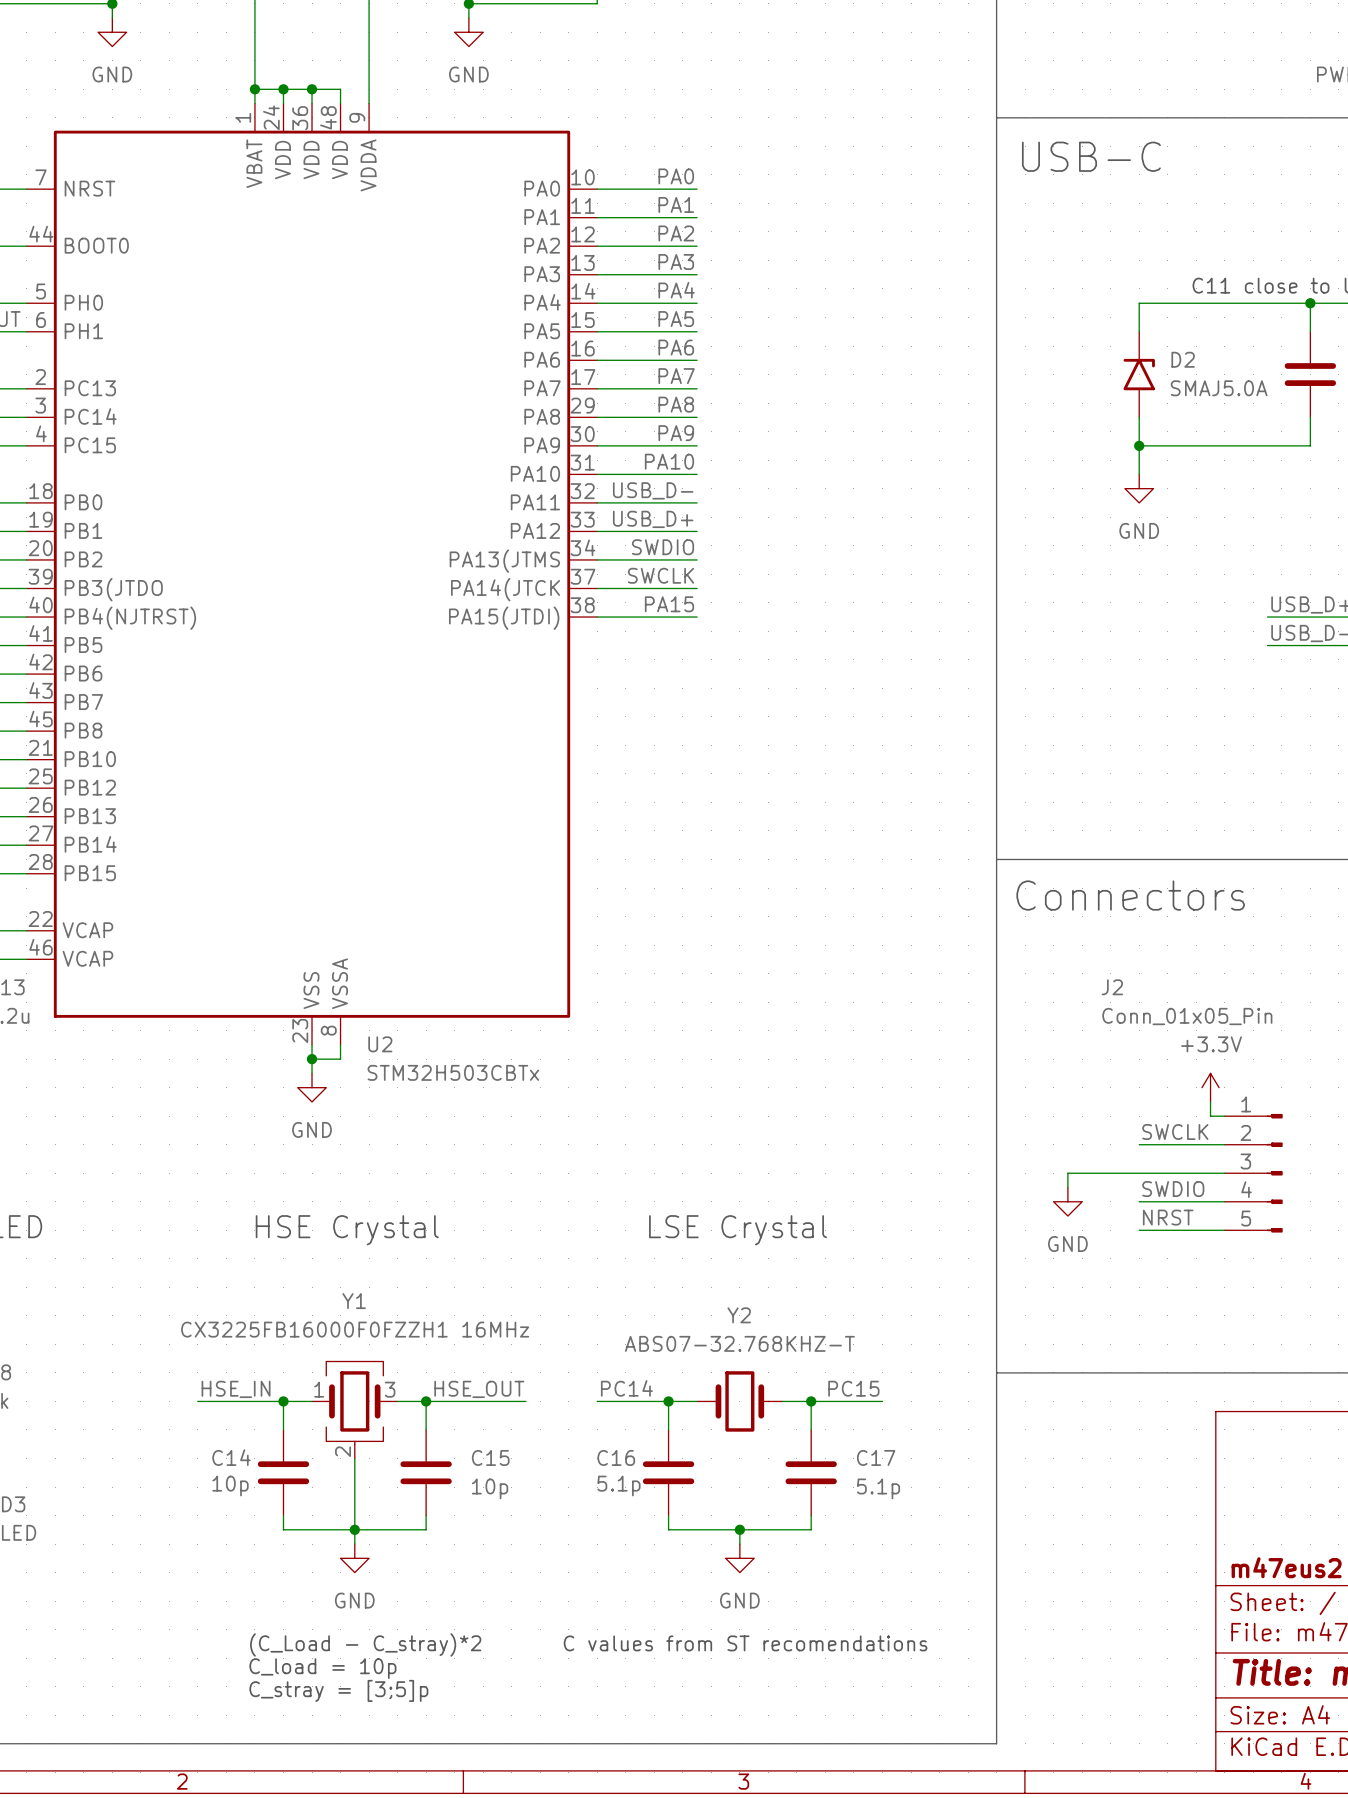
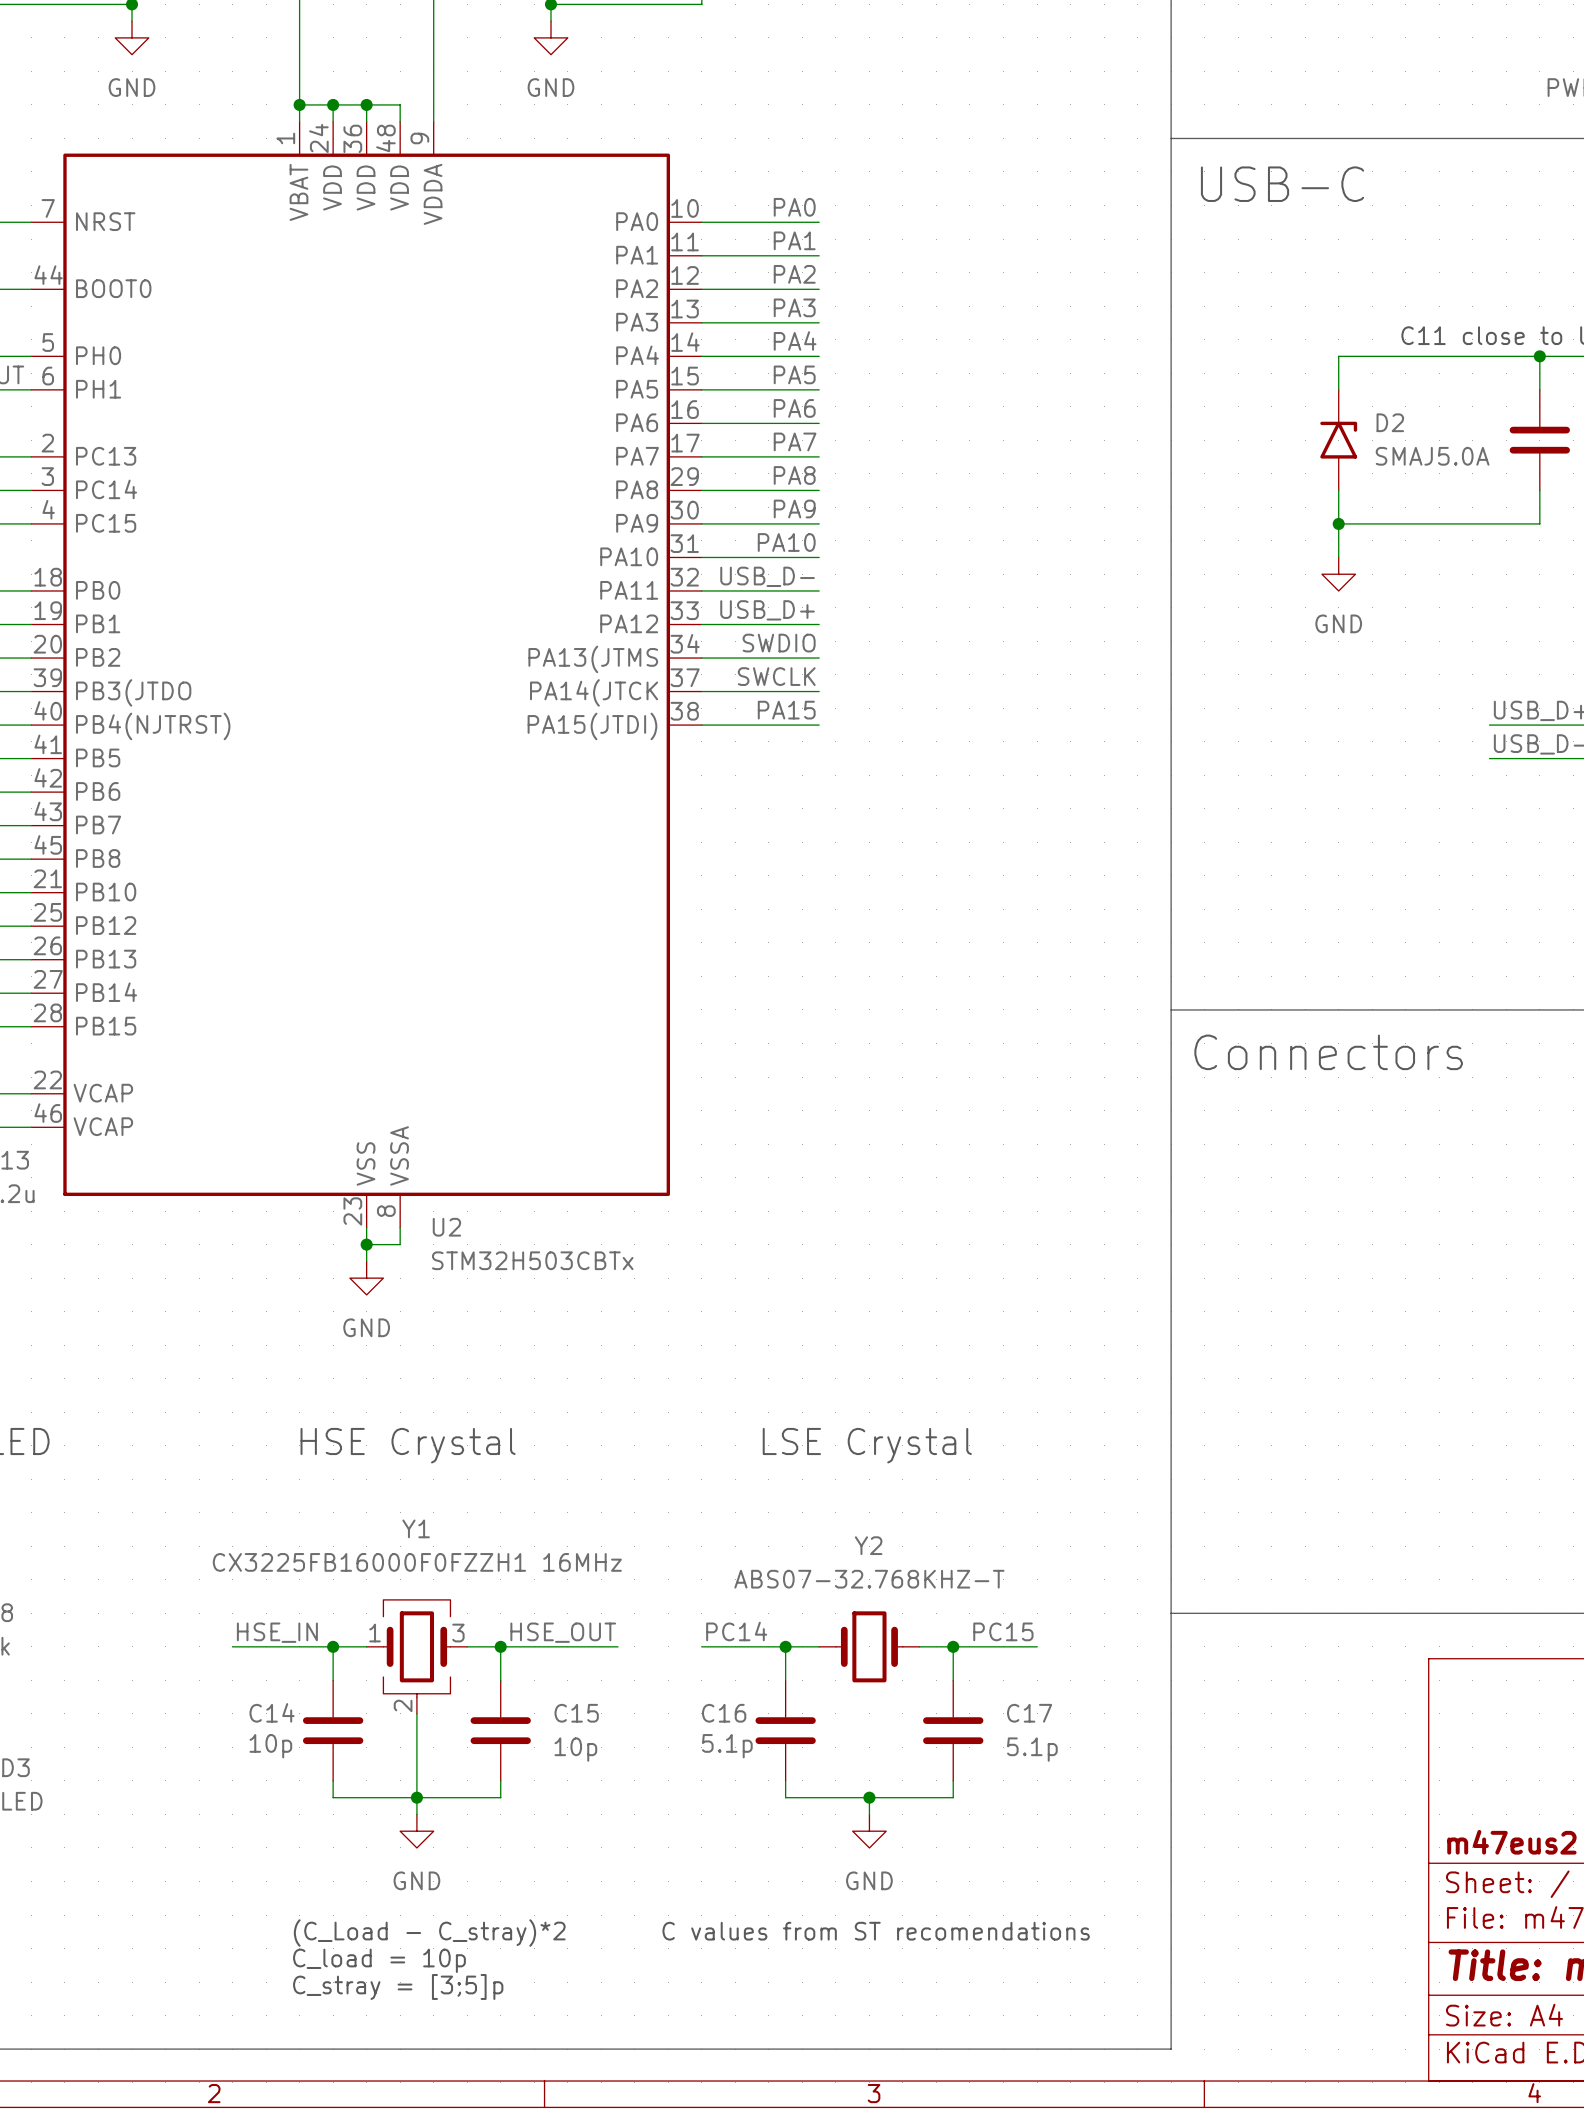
power symbol: +3.3V (1210, 1087) -> none
wire: (1210, 1101) (1210, 1116) (1224, 1116) -> none
label: SWCLK (1175, 1131) -> none
wire: (1139, 1144) (1224, 1144) -> none
wire: (1224, 1173) (1067, 1173) (1067, 1187) -> none
J2: Conn_01x05_Pin (1253, 1173) -> none
label: SWDIO (1173, 1189) -> none
power symbol: GND (1067, 1201) -> none
wire: (1139, 1201) (1224, 1201) -> none
label: NRST (1168, 1217) -> none
wire: (1139, 1230) (1224, 1230) -> none

